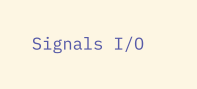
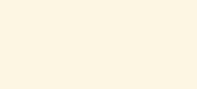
text: Signals I/O (87, 44) -> none

